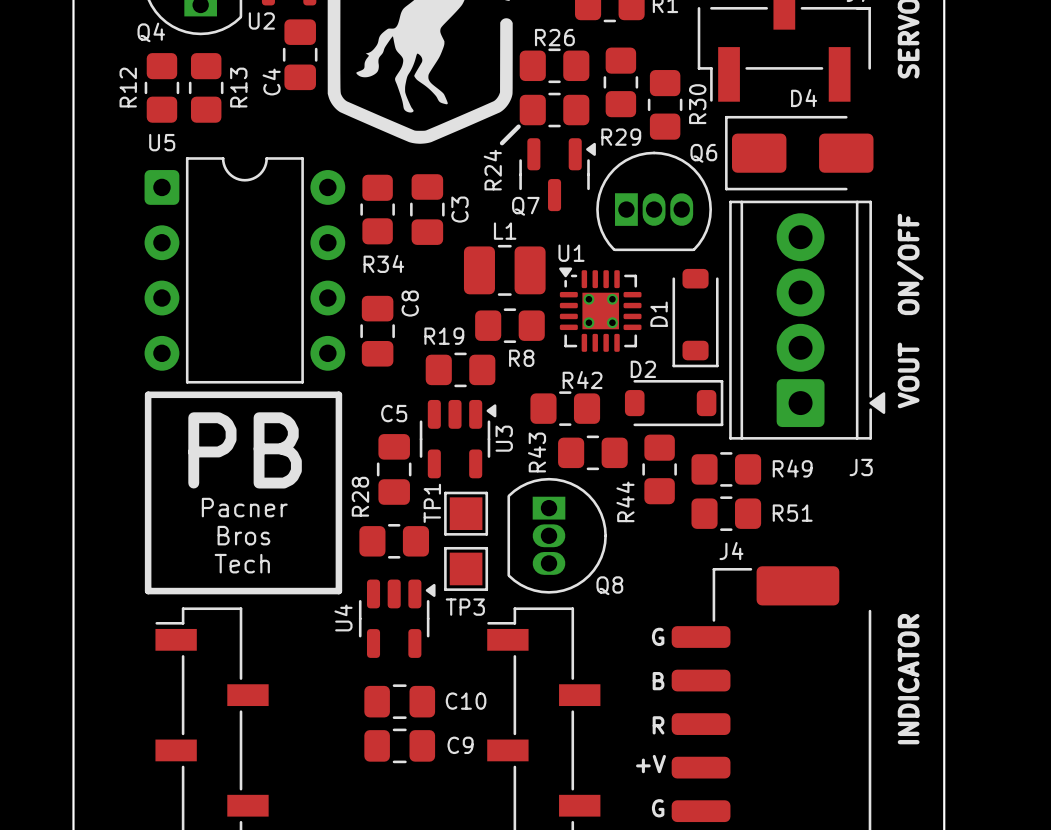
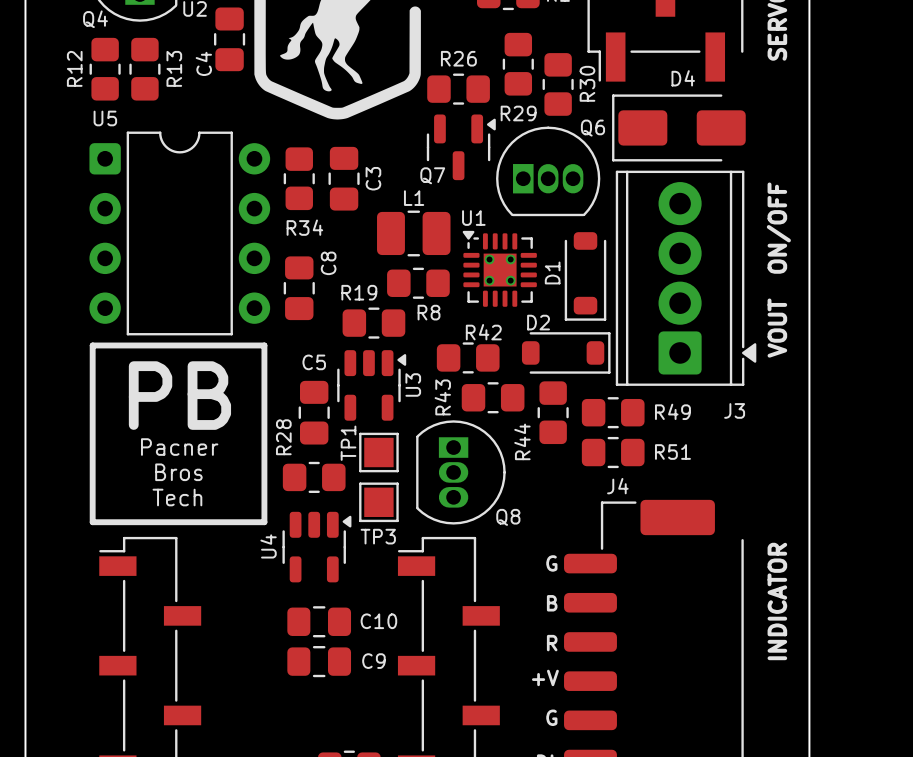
R26: (554, 65) -> none
line: (518, 126) (502, 143) -> none
R24 name: R24 (492, 170) -> R26 (458, 58)

